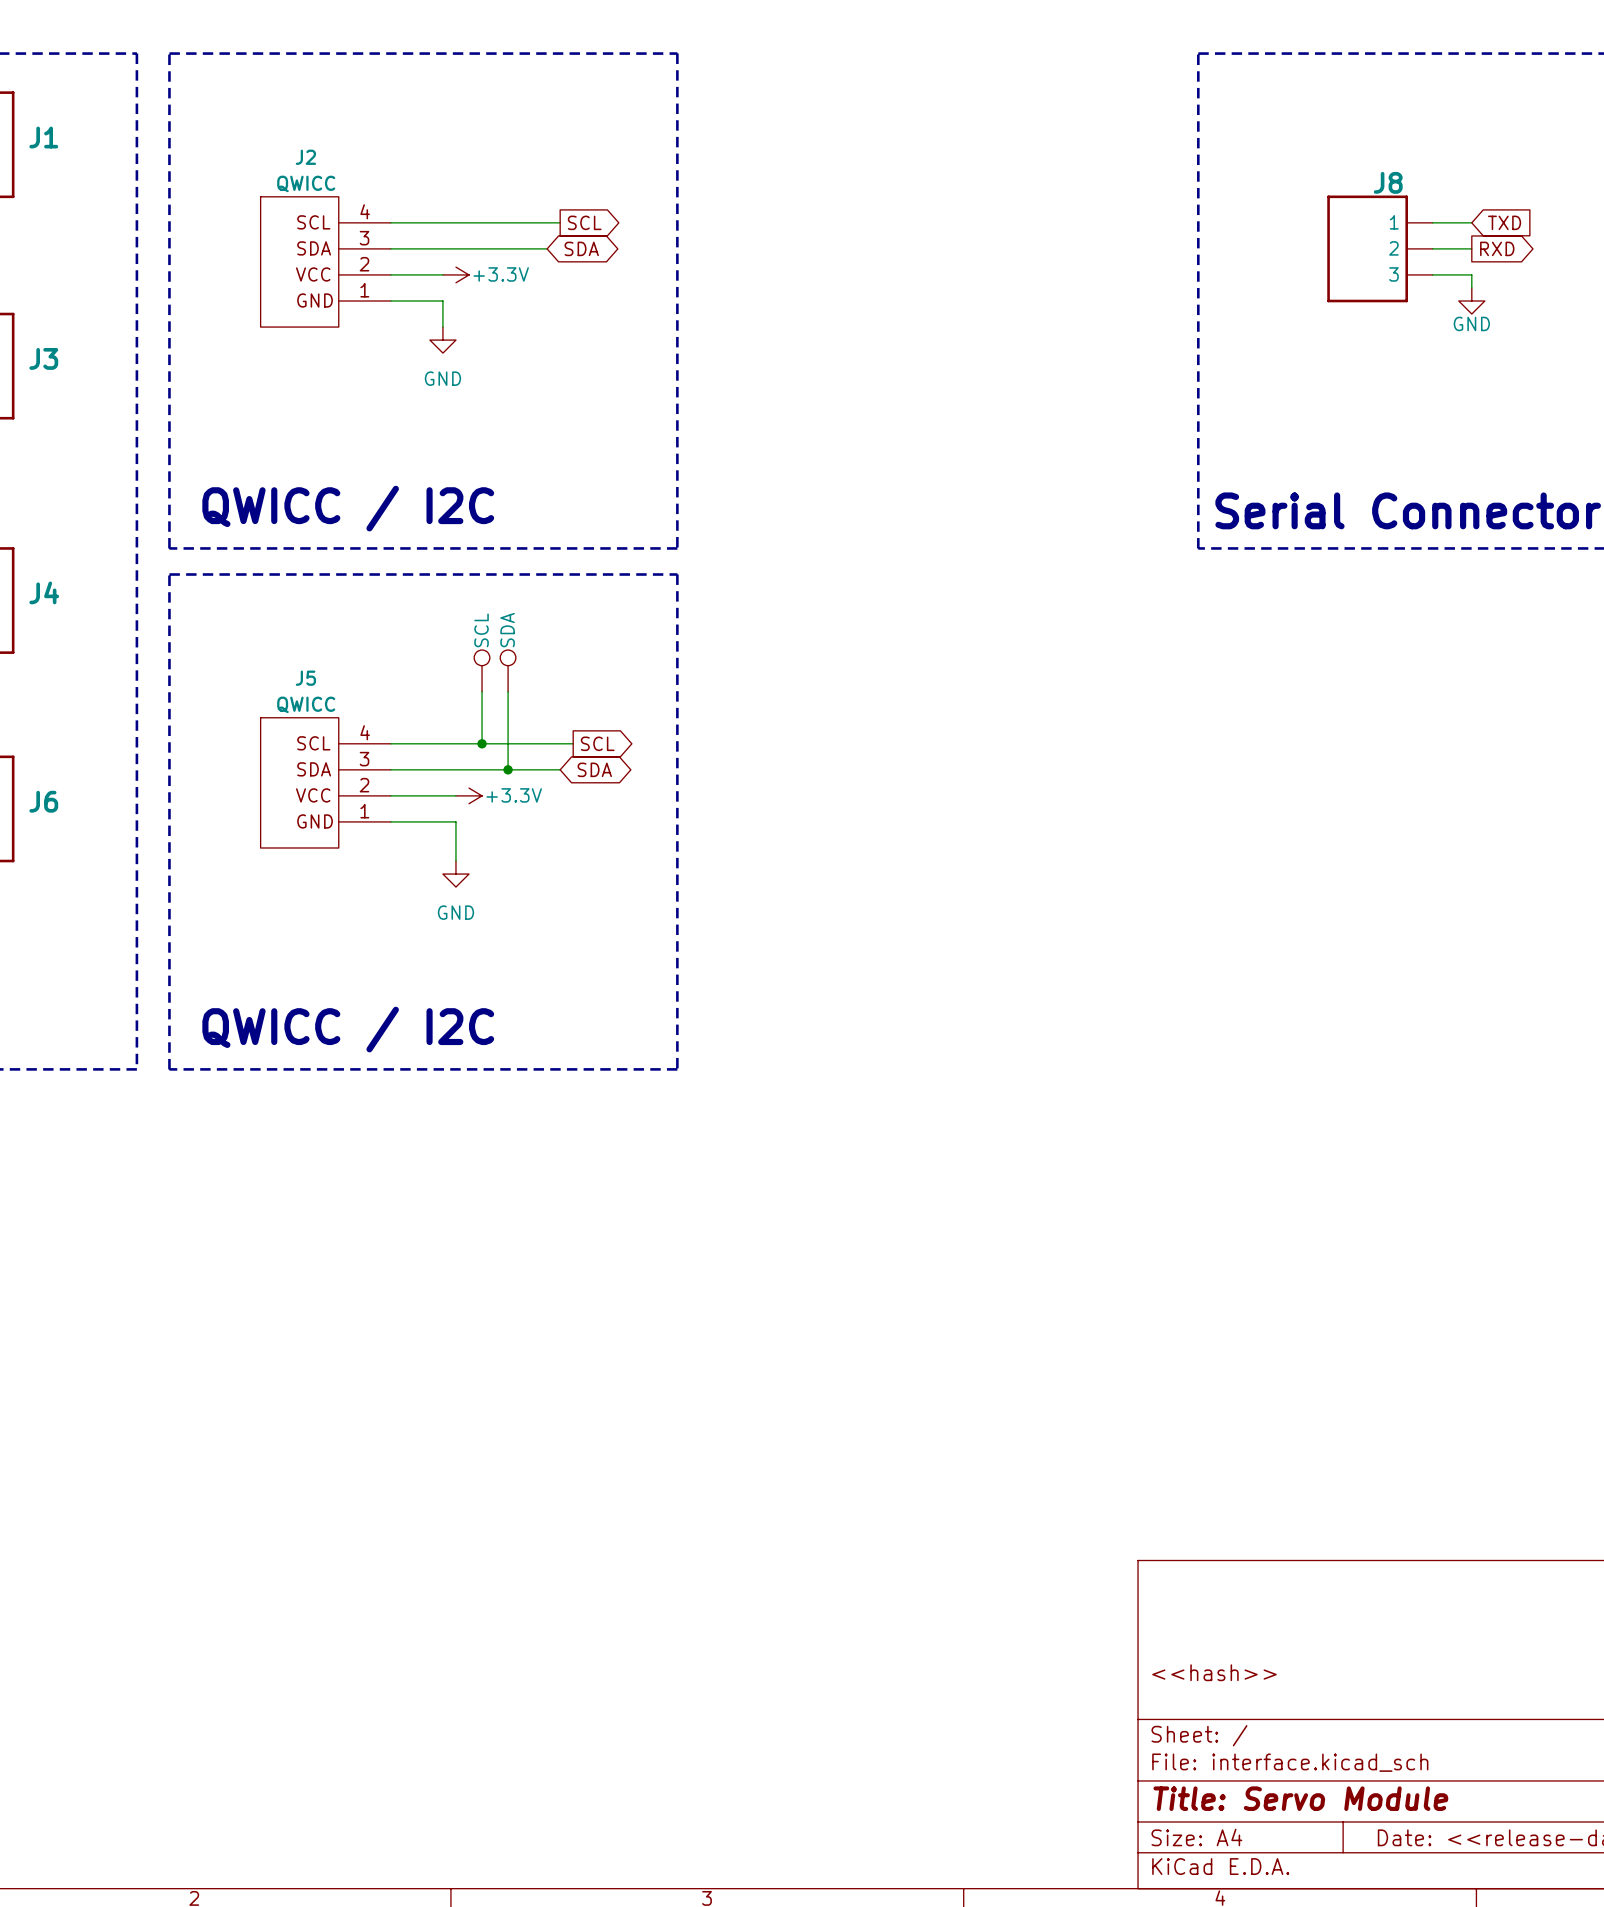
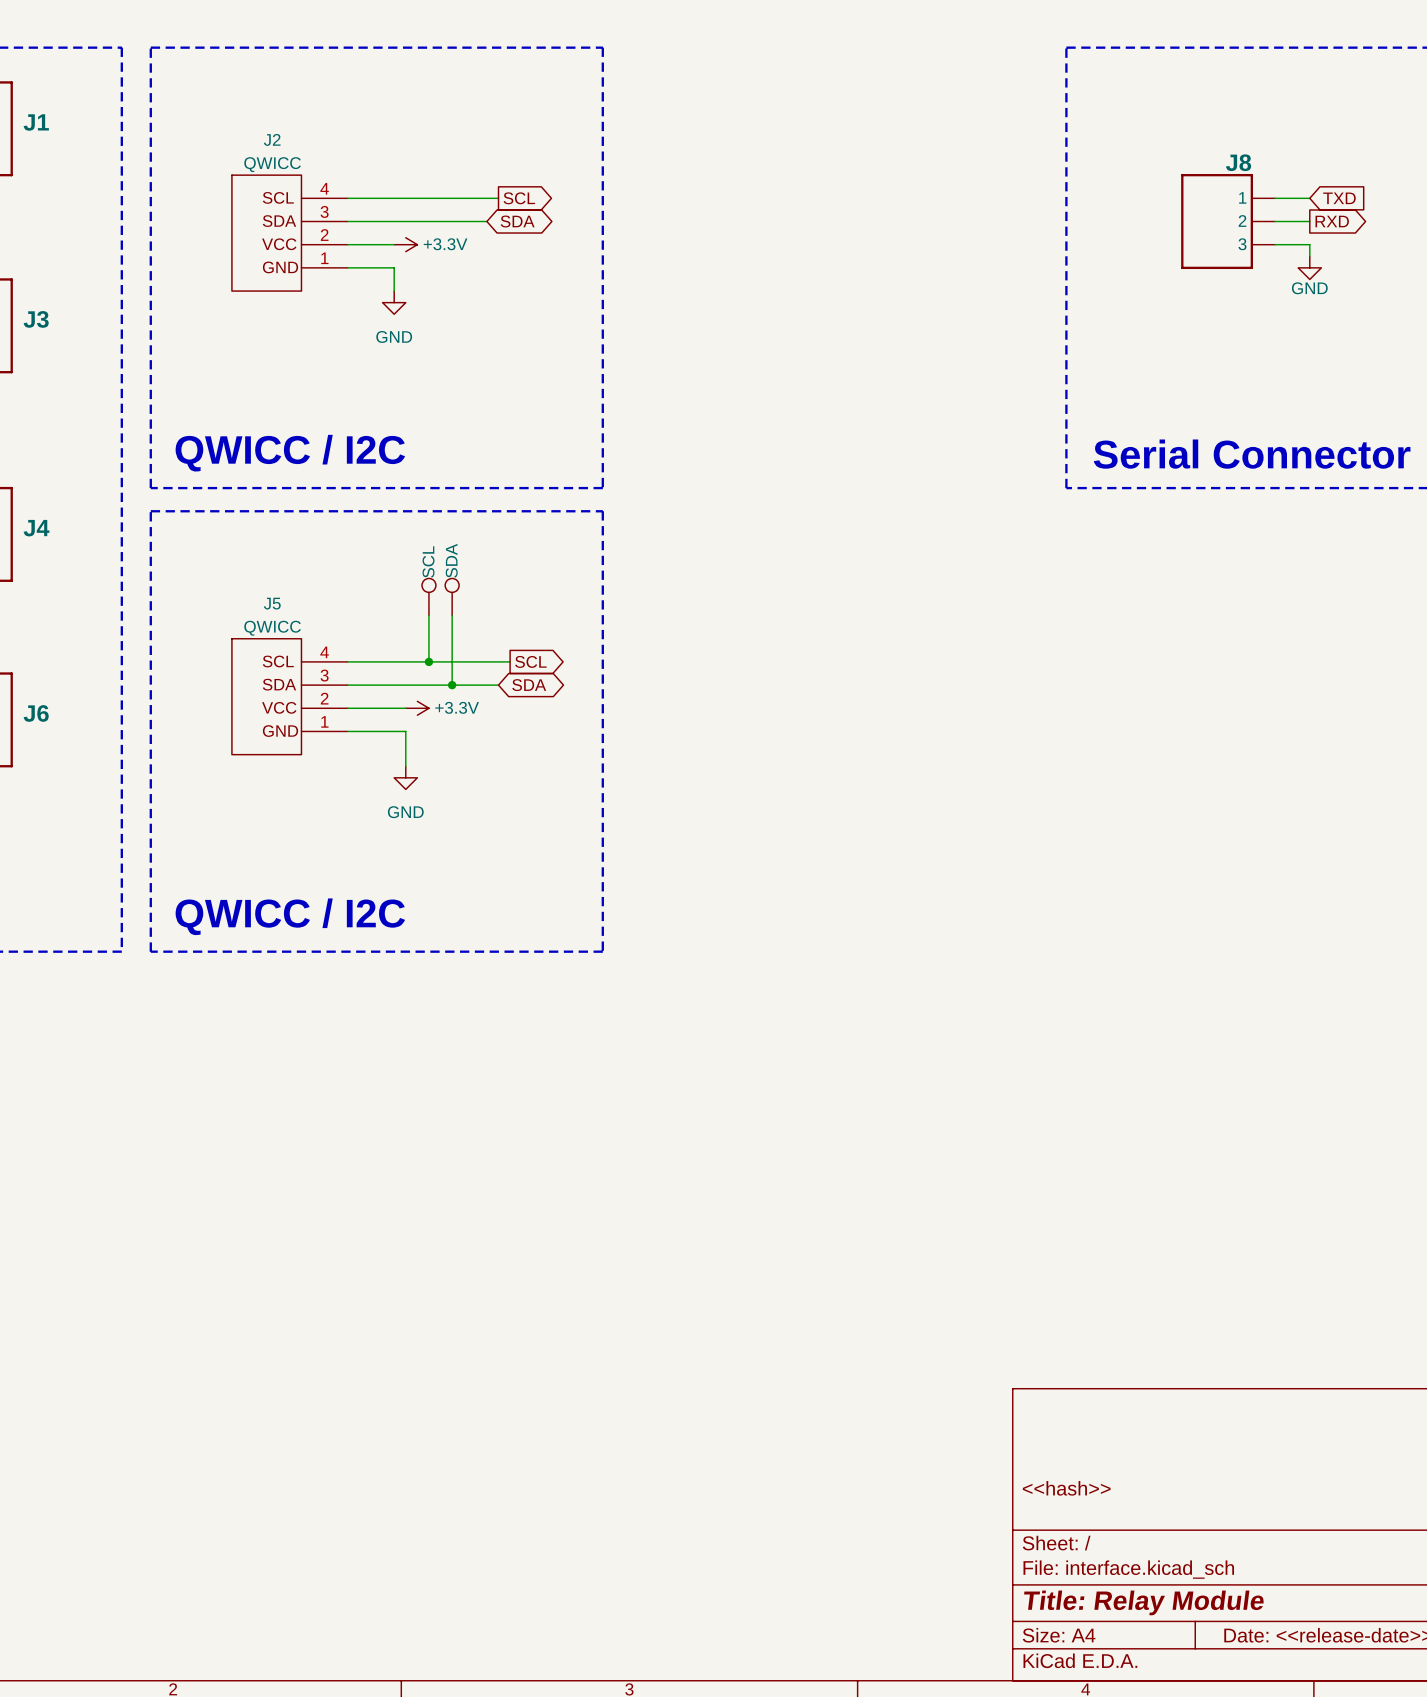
title block: Title: Servo Module (1300, 1798) -> Title: Relay Module (1144, 1602)

